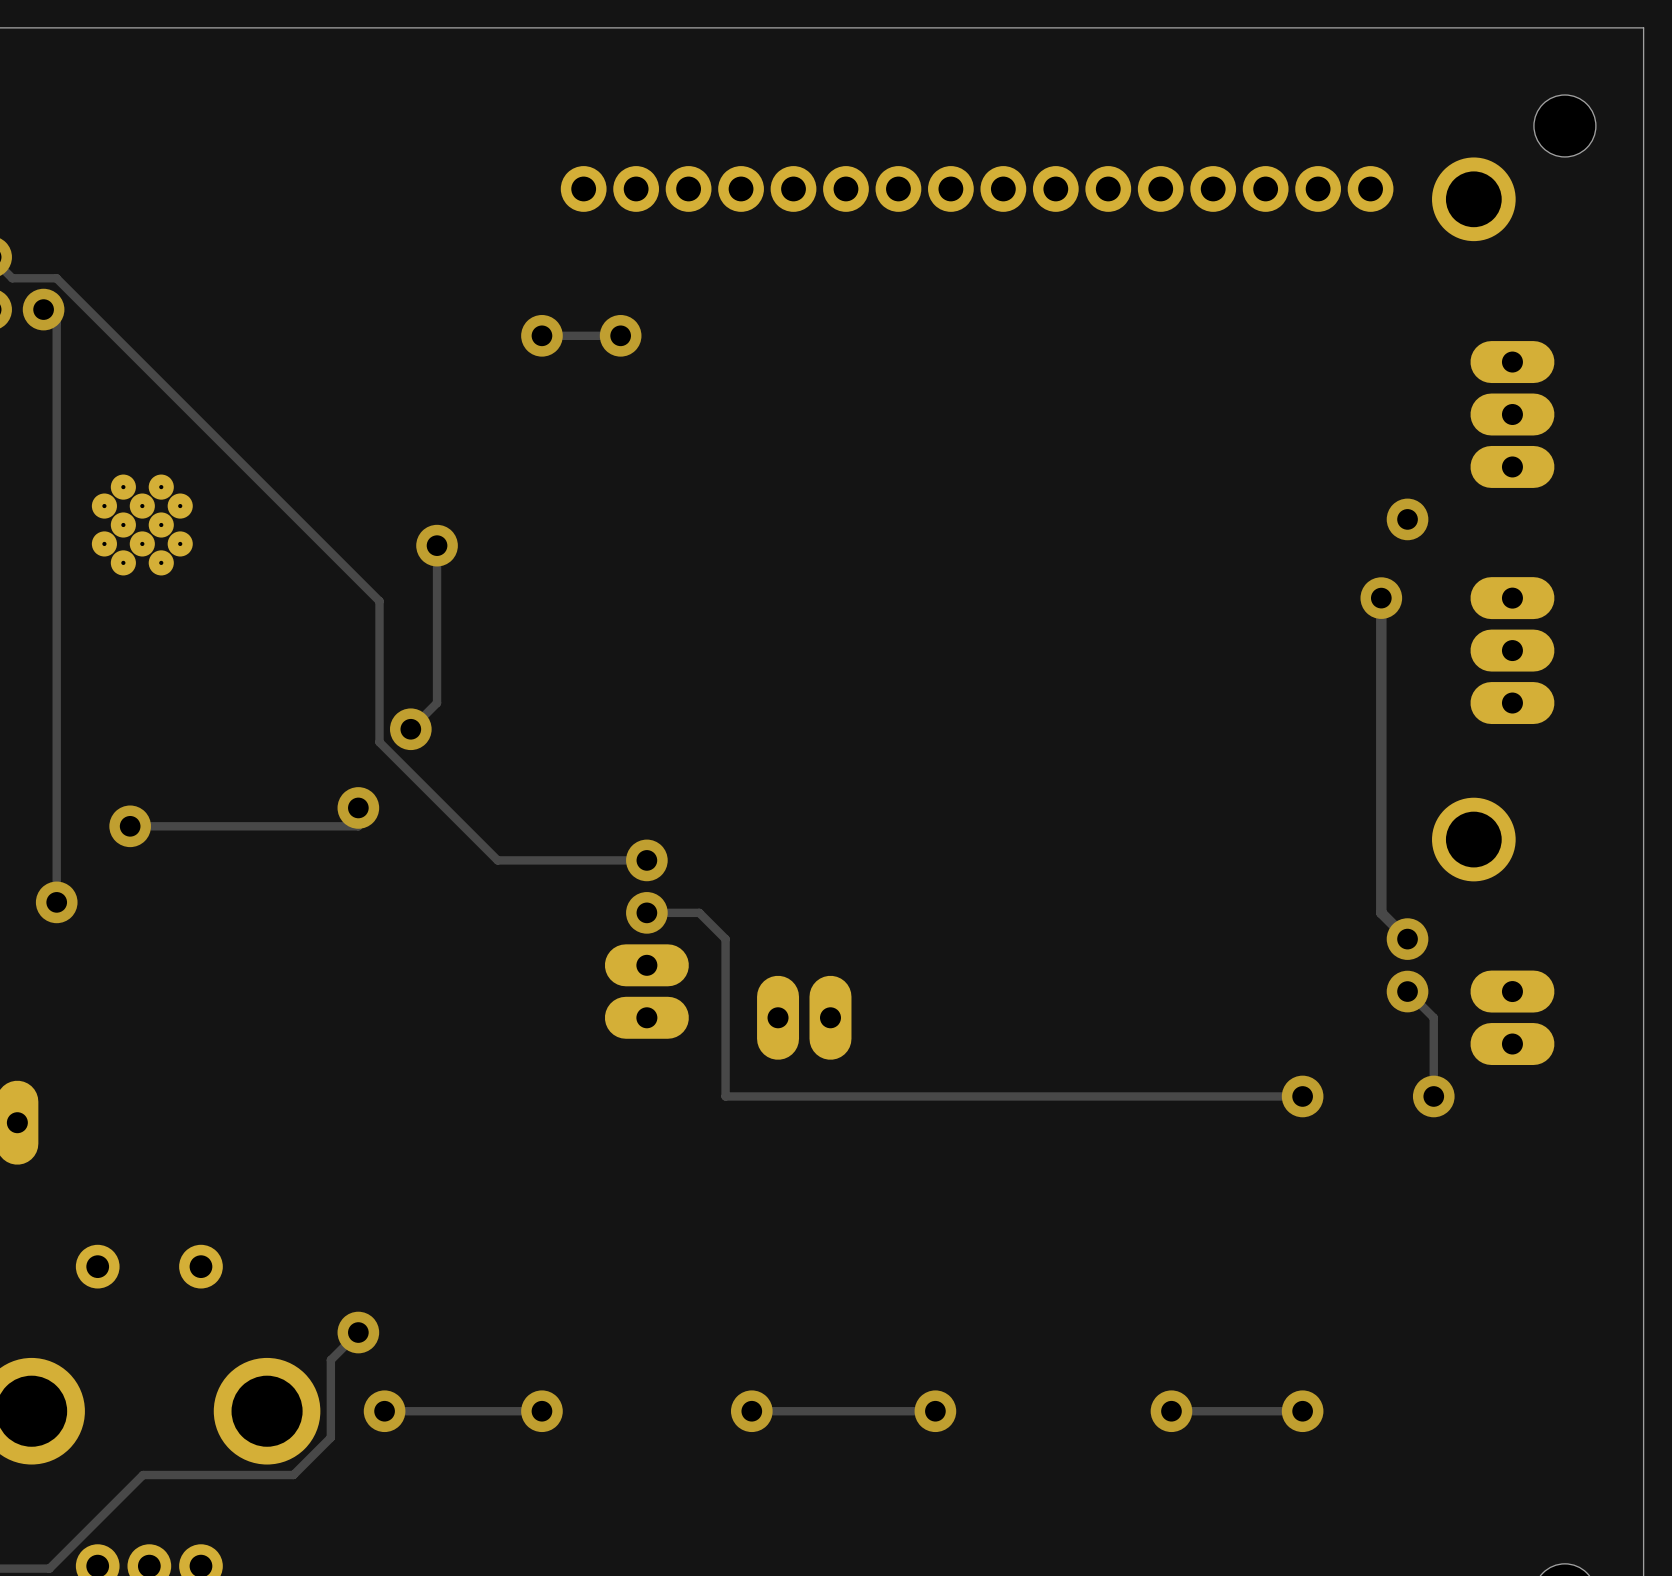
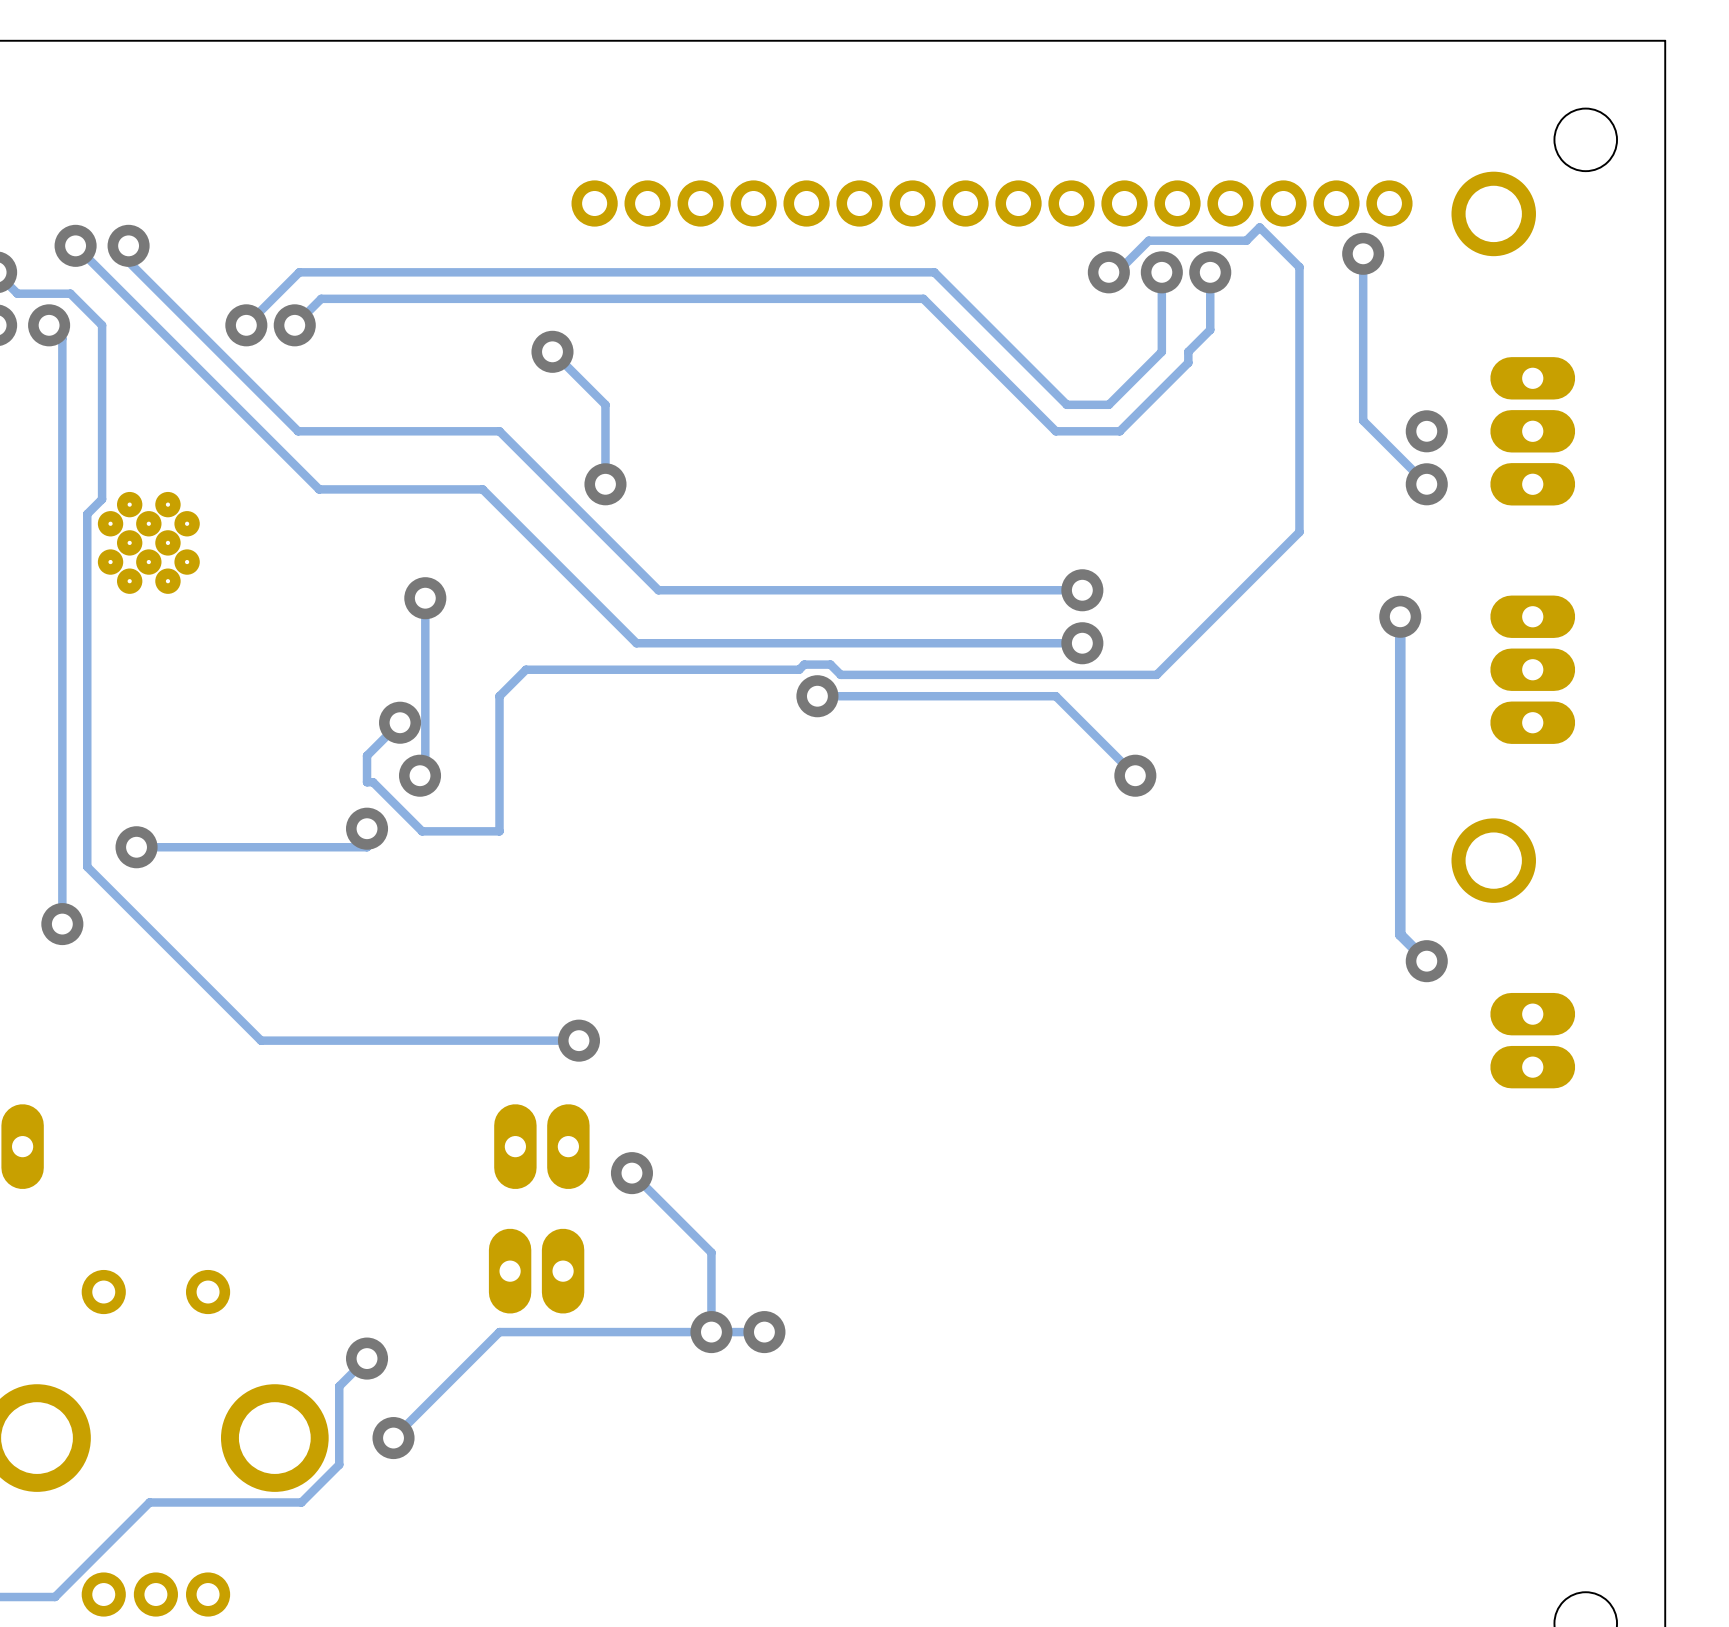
track: none -> (75, 245) (319, 489) (482, 489) (636, 643) (1082, 643)
via: none -> (75, 245)
track: none -> (128, 245) (128, 261) (298, 431) (499, 431) (658, 590) (1082, 590)
via: none -> (128, 245)
track: none -> (1363, 253) (1363, 420) (1426, 484)
via: none -> (1363, 253)
track: none -> (1108, 272) (1117, 272) (1148, 240) (1246, 240) (1259, 227) (1299, 267) (1299, 532) (1156, 674) (840, 674) (830, 664) (804, 664) (799, 669) (525, 669) (499, 696) (499, 831) (422, 831) (373, 782) (367, 782) (367, 755) (400, 722)
via: none -> (1108, 272)
track: none -> (1161, 272) (1161, 351) (1108, 404) (1066, 404) (934, 272) (299, 272) (246, 325)
via: none -> (1161, 272)
track: none -> (1210, 272) (1210, 329) (1188, 351) (1188, 362) (1119, 431) (1055, 431) (923, 298) (321, 298) (294, 325)
via: none -> (1210, 272)
track: (56, 278) (379, 601) (379, 742) (497, 860) (646, 860) -> (62, 293) (70, 293) (102, 325) (102, 499) (87, 514) (87, 866) (261, 1040) (578, 1040)
via: none -> (246, 325)
via: none -> (294, 325)
track: (620, 335) (541, 335) -> (605, 484) (605, 404) (552, 351)
via: (620, 335) -> none
via: none -> (1426, 431)
via: none -> (605, 484)
via: none -> (1426, 484)
via: (1407, 519) -> none
track: (437, 545) (437, 703) (410, 729) -> none
via position: (437, 545) -> (425, 598)
via: none -> (1082, 590)
track: none -> (425, 598) (425, 770) (420, 775)
via: none -> (1082, 643)
track: none -> (817, 696) (1055, 696) (1135, 775)
via: none -> (817, 696)
via: none -> (400, 722)
via: (410, 729) -> none
via: none -> (420, 775)
via: none -> (1135, 775)
via: (646, 860) -> none
track: (646, 912) (699, 912) (725, 939) (725, 1096) (1302, 1096) -> none
via: (646, 912) -> none
part: (646, 991) -> none
track: (1407, 991) (1433, 1017) (1433, 1096) -> none
via: (1407, 991) -> none
via: none -> (578, 1040)
part: (804, 1017) -> none
via: (1302, 1096) -> none
via: (1433, 1096) -> none
part: none -> (541, 1146)
track: none -> (631, 1173) (711, 1252) (711, 1332)
via: none -> (631, 1173)
part: none -> (536, 1271)
via: none -> (711, 1332)
via: none -> (764, 1332)
track: (541, 1411) (384, 1411) -> (764, 1332) (499, 1332) (393, 1438)
via: (541, 1411) -> none
via: (751, 1411) -> none
track: (935, 1411) (751, 1411) -> none
via: (935, 1411) -> none
via: (1171, 1411) -> none
track: (1302, 1411) (1171, 1411) -> none
via: (1302, 1411) -> none

